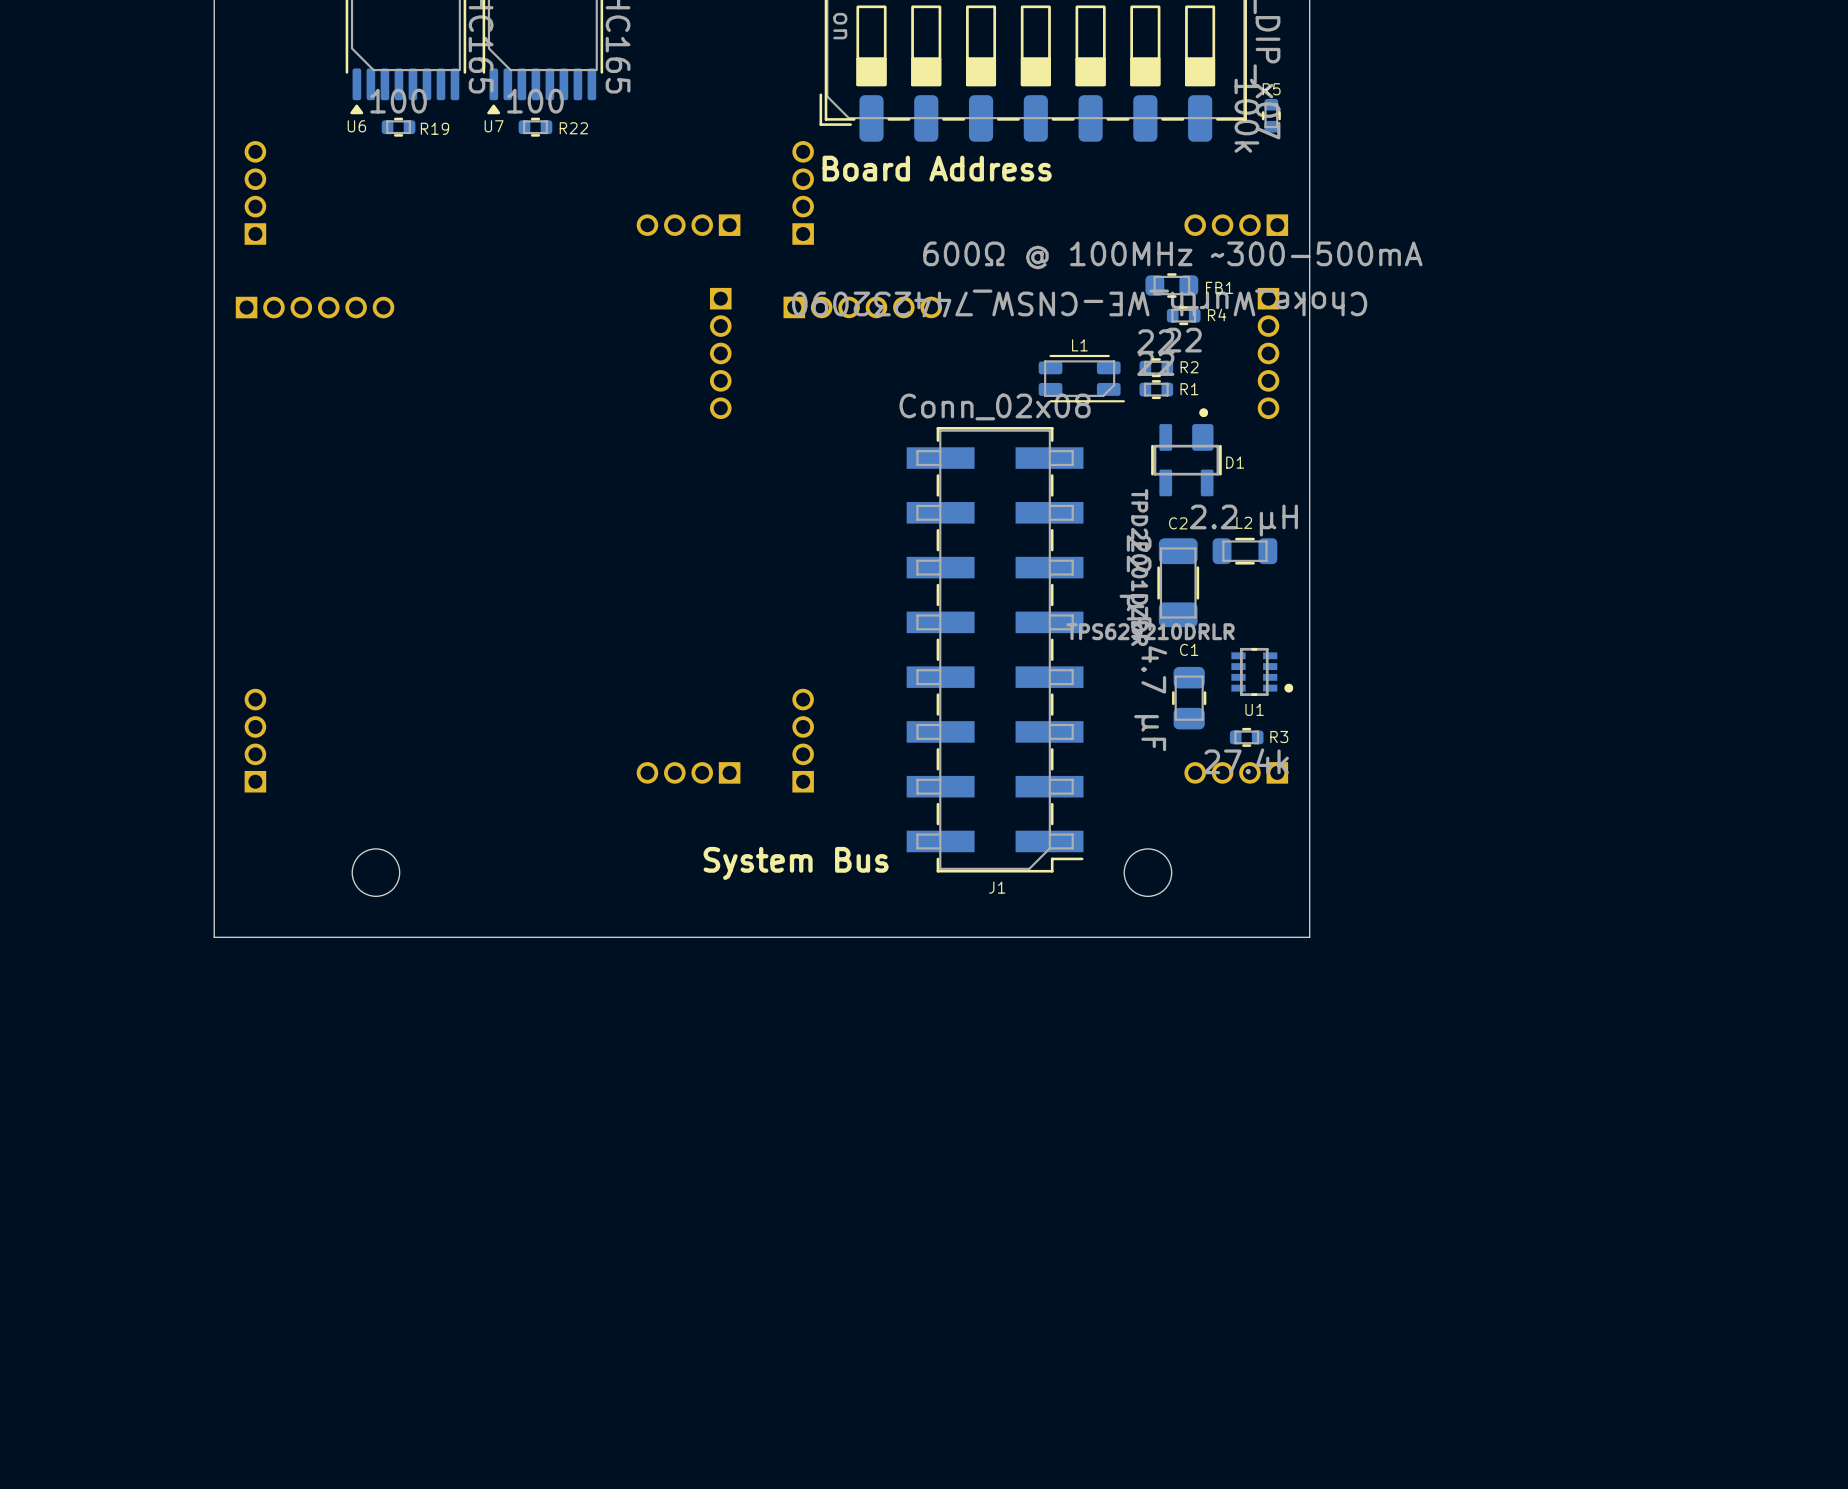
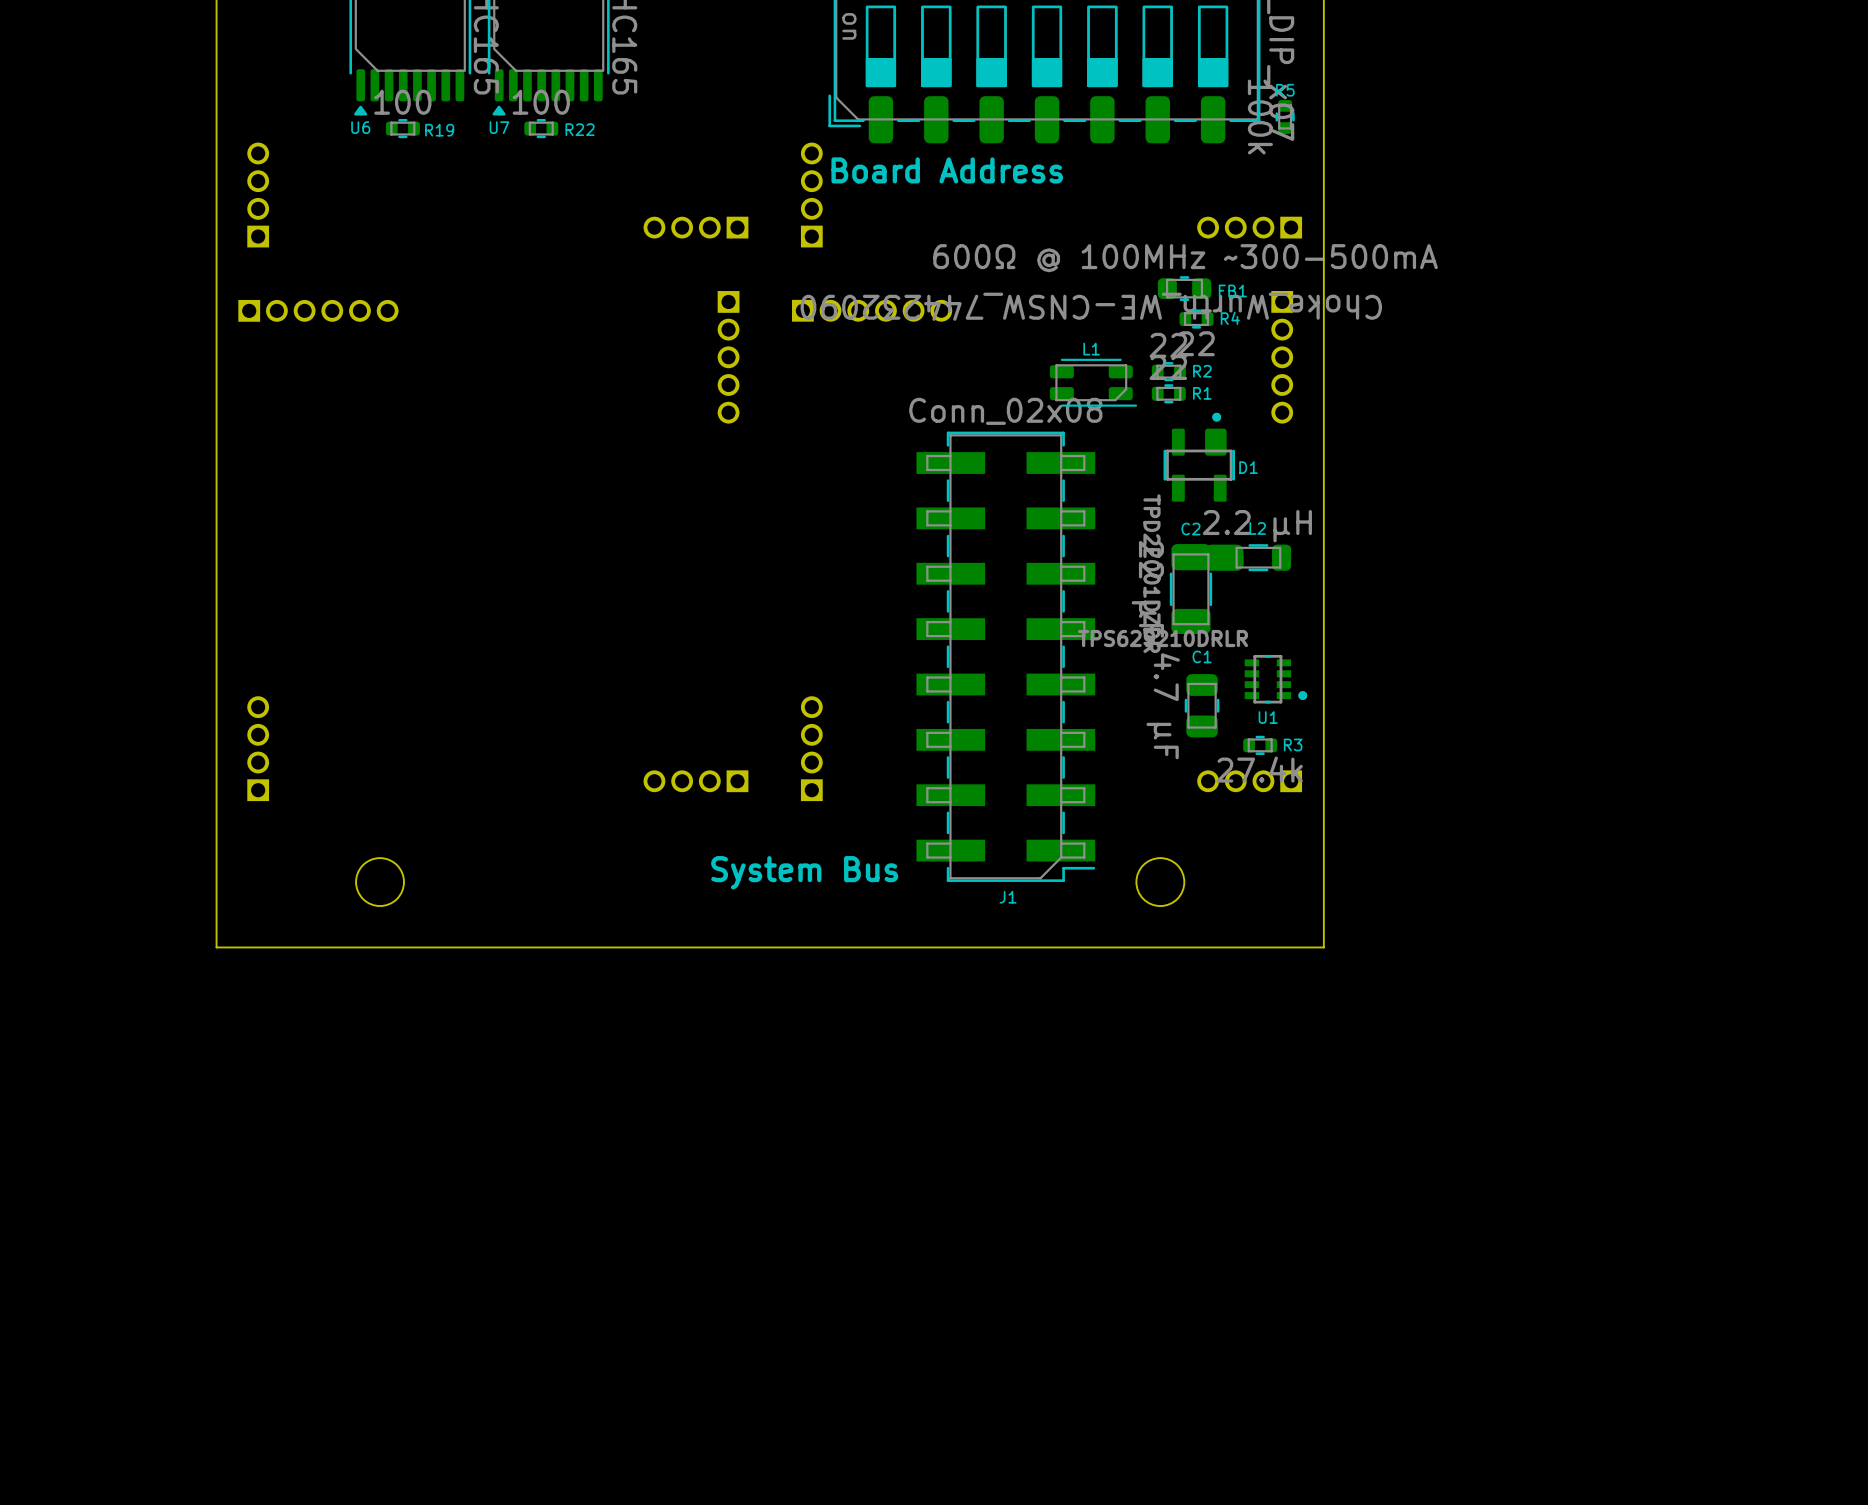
L2 footprint: [1212, 537, 1278, 565] -> [1204, 544, 1292, 572]

